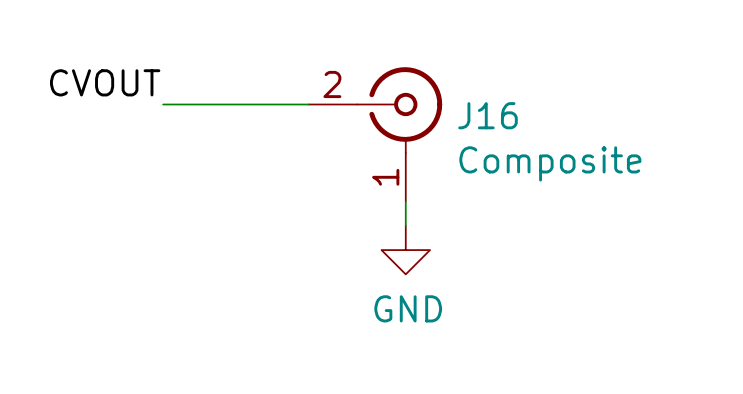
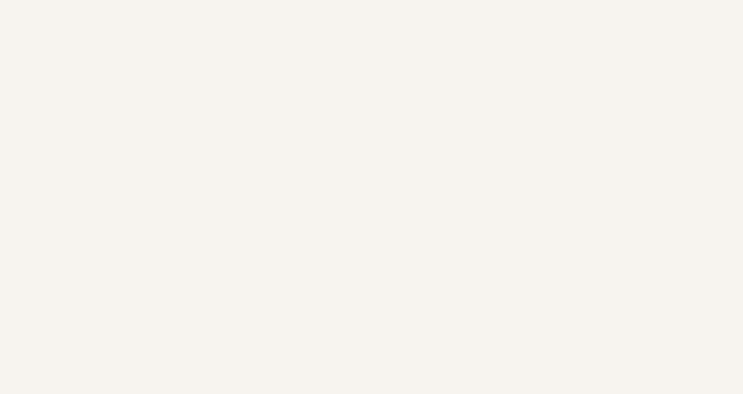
label: CVOUT (105, 82) -> none
wire: (163, 104) (308, 104) -> none
J16: Composite (375, 134) -> none
wire: (405, 201) (405, 225) -> none
power symbol: GND (405, 250) -> none

